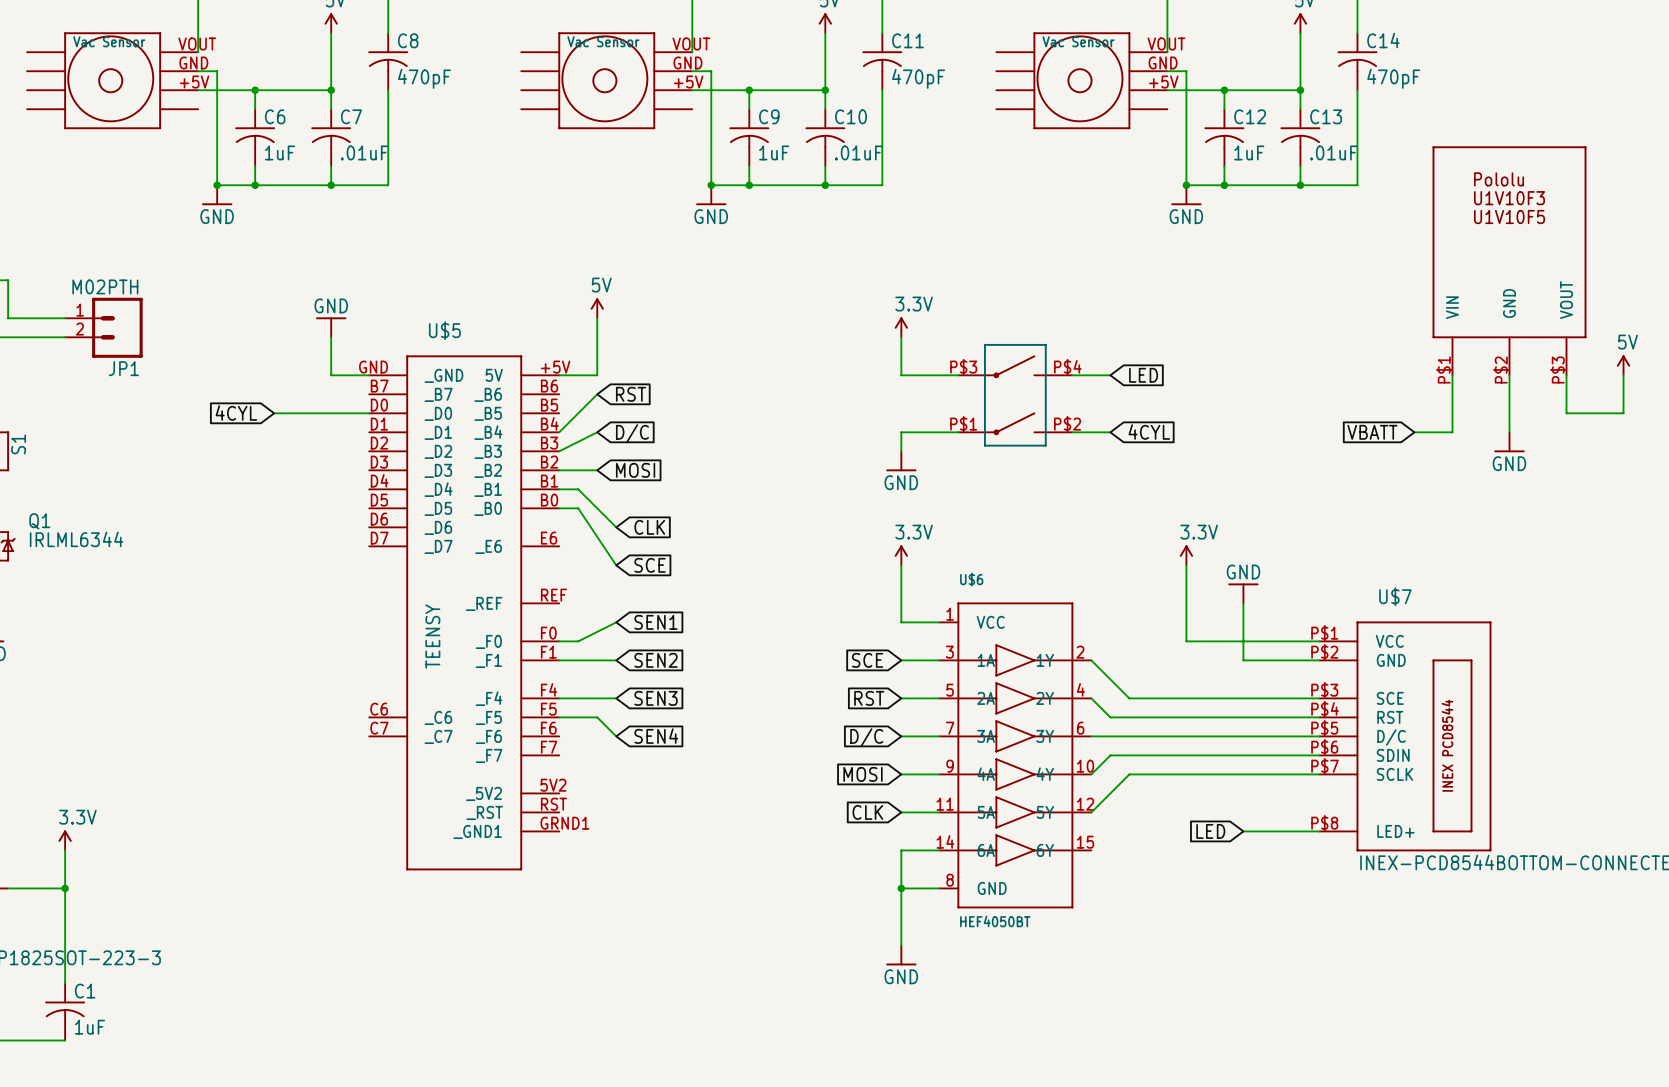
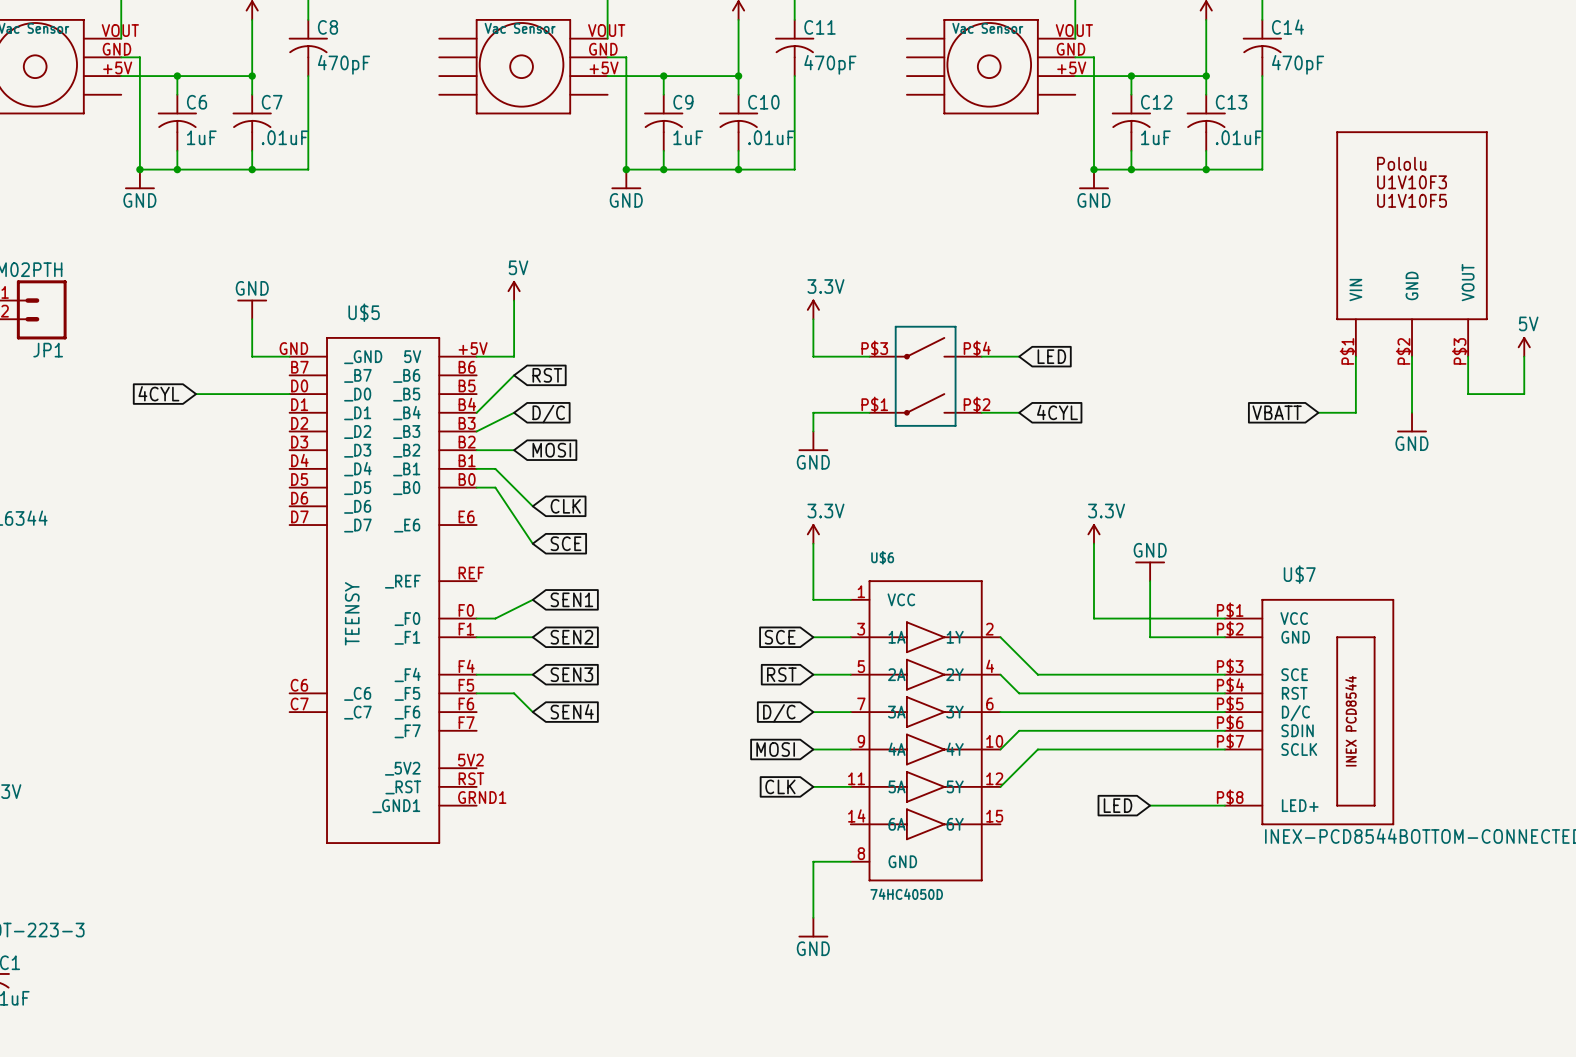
wire: (939, 850) (901, 850) (901, 888) -> none
junction: (901, 888) -> none
U$6 value: HEF4050BT (995, 921) -> 74HC4050D (906, 894)

